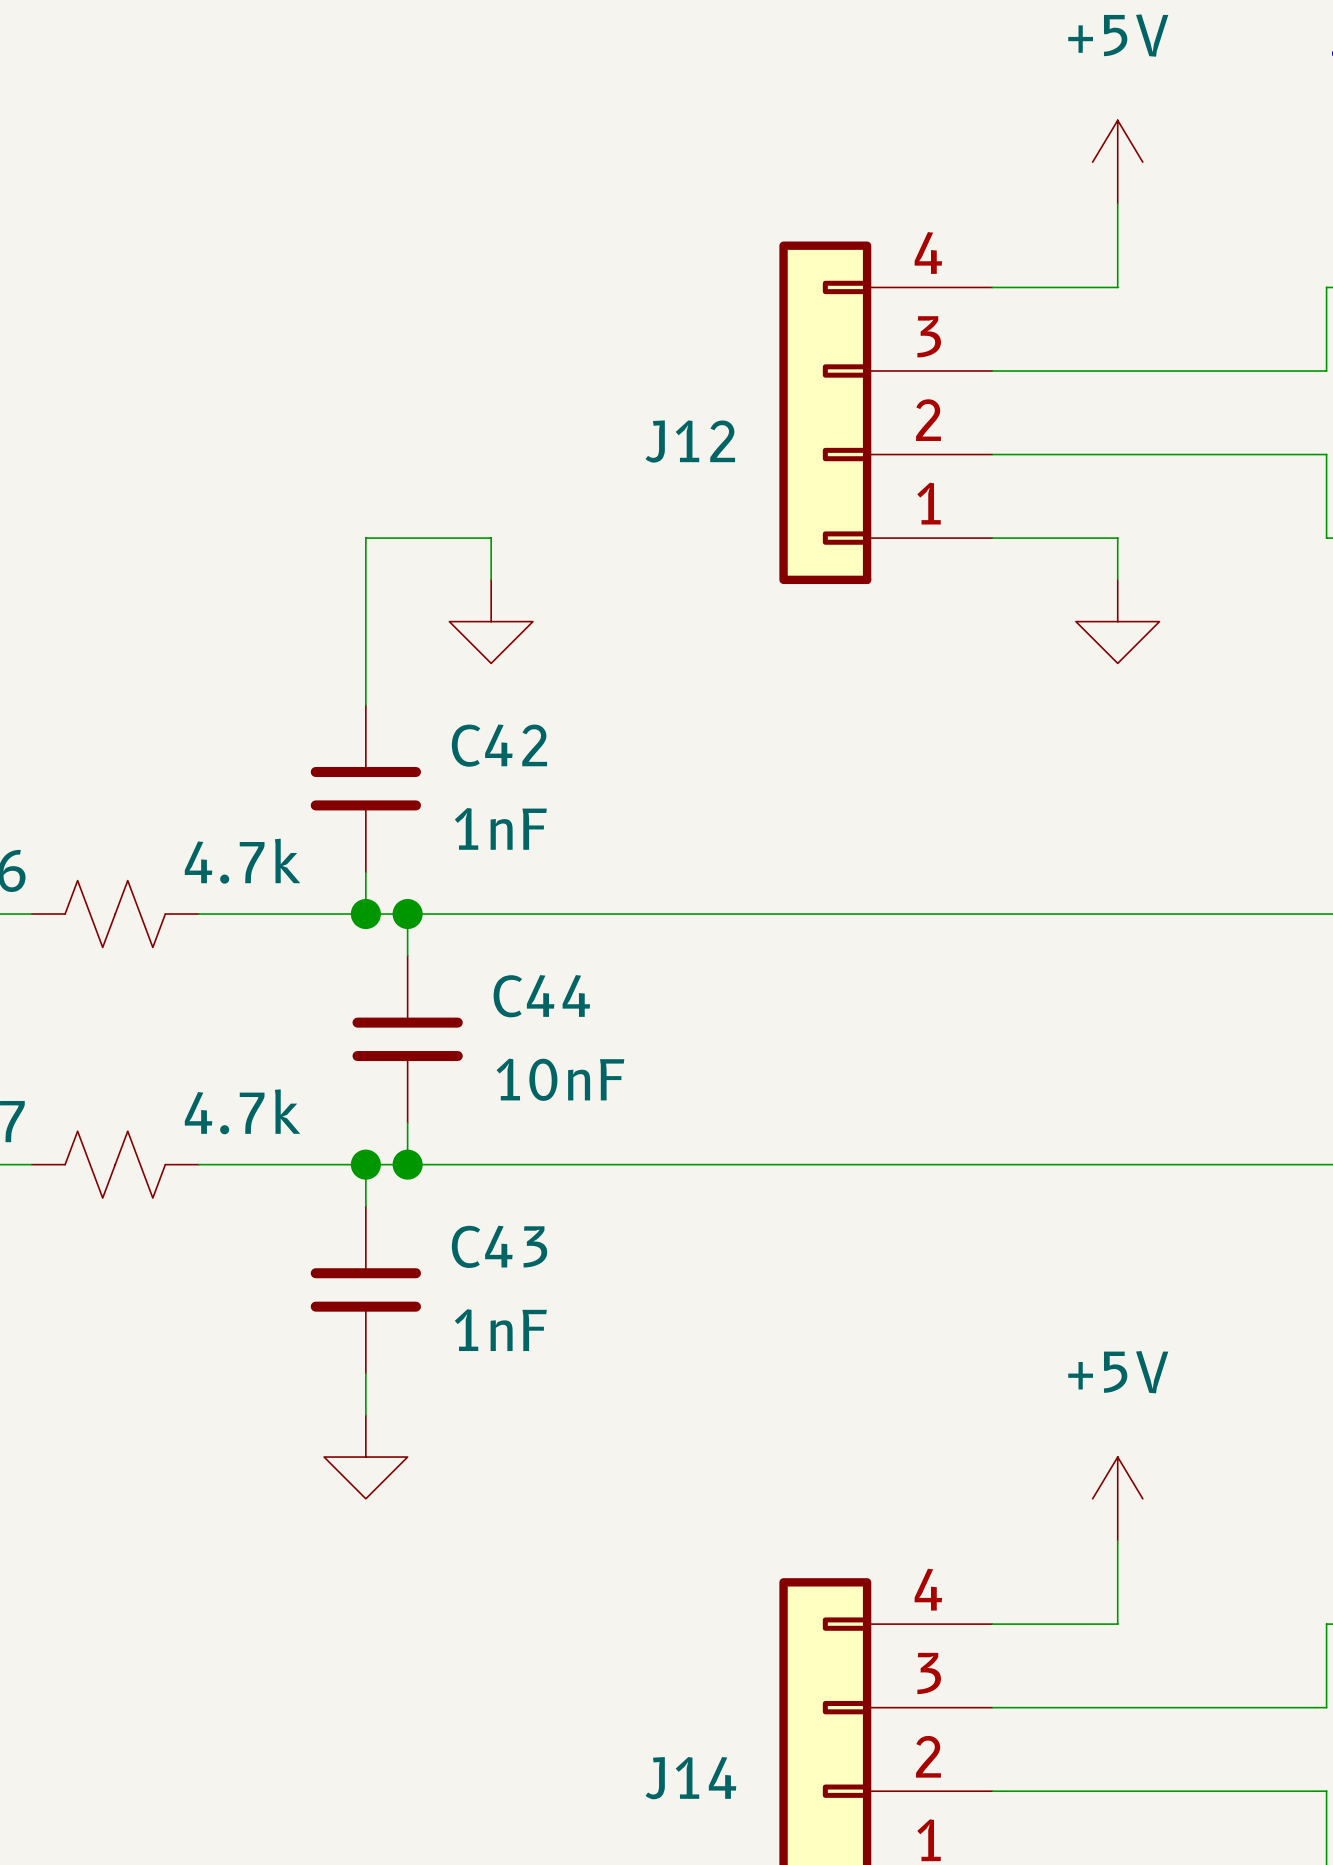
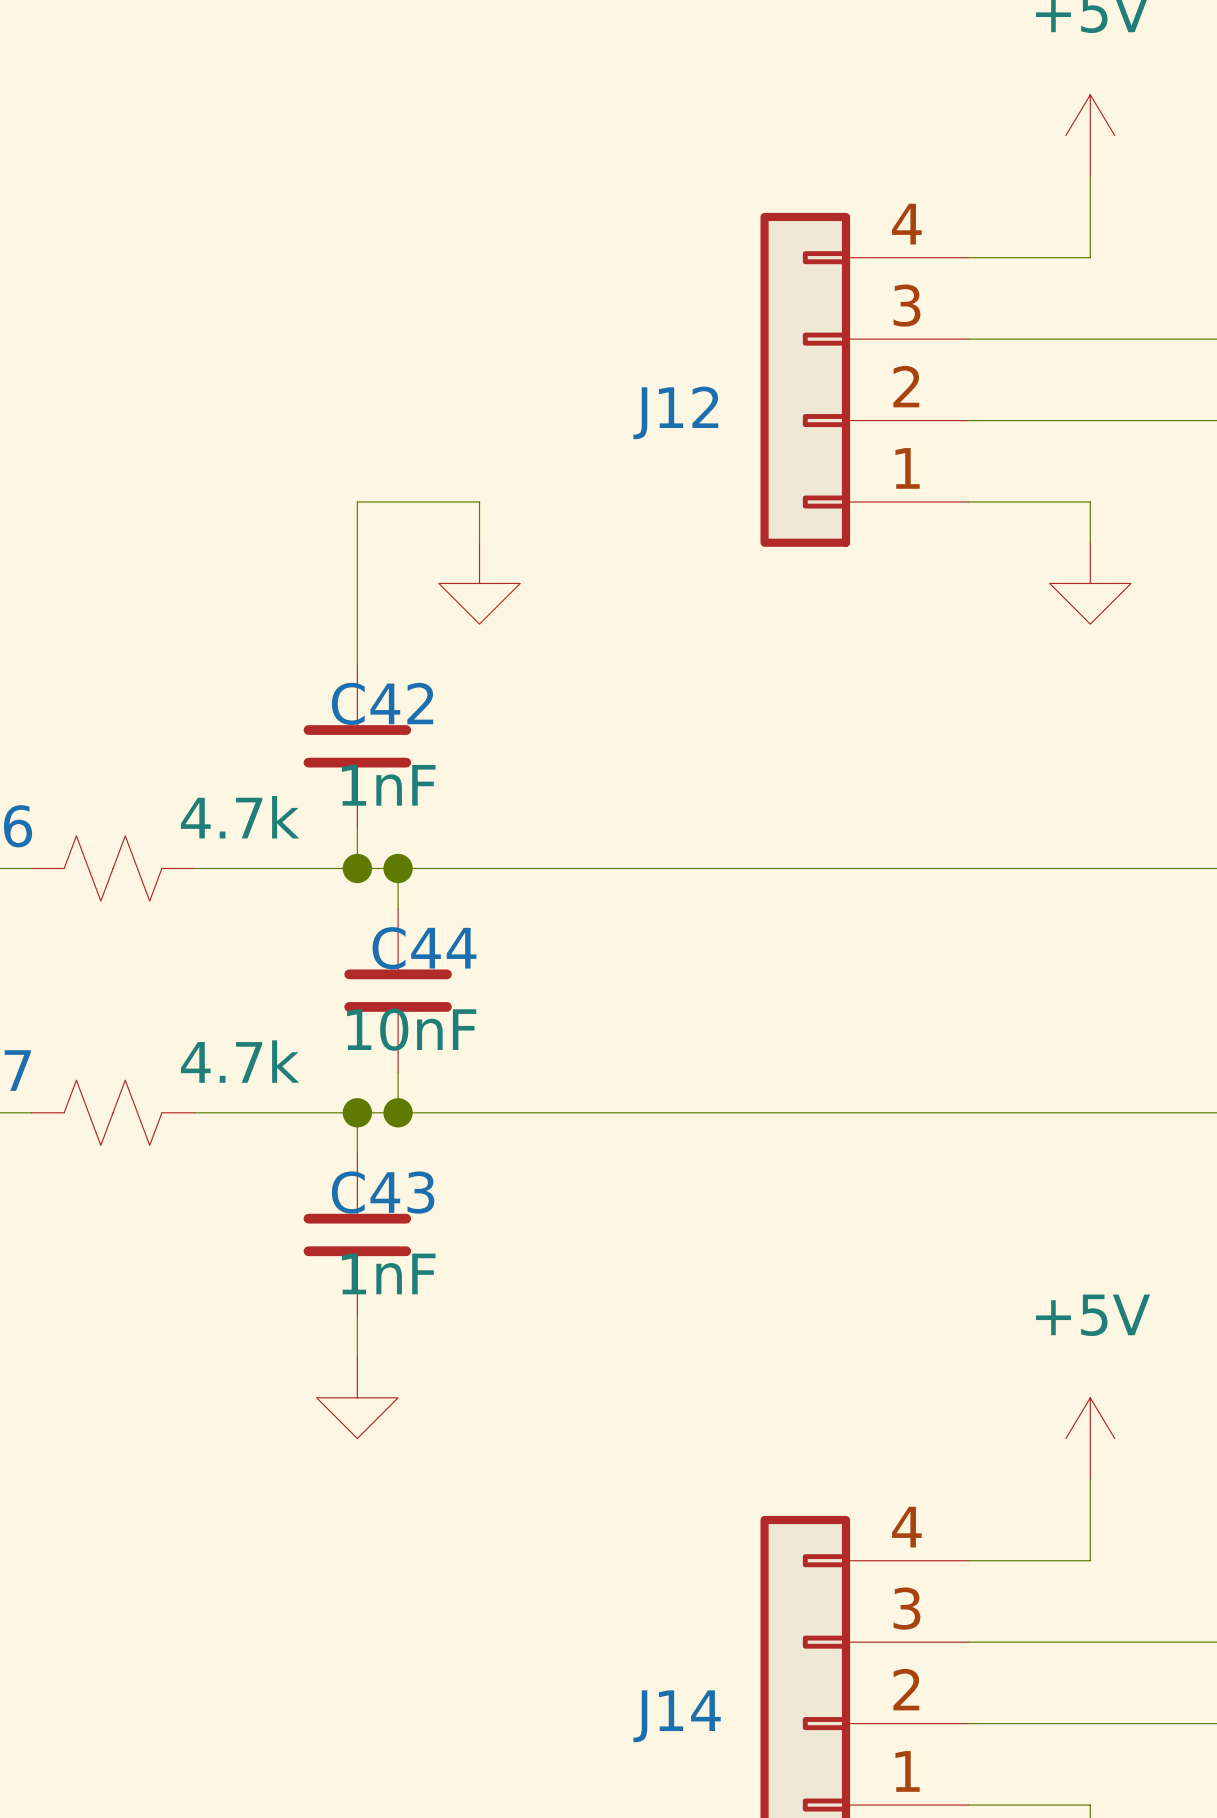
C42 name position: C42 (499, 745) -> C42 (382, 703)
C42 value position: 1nF (500, 828) -> 1nF (388, 785)
C44 name position: C44 (541, 996) -> C44 (424, 948)
C44 value position: 10nF (560, 1079) -> 10nF (411, 1029)
C43 name position: C43 (499, 1246) -> C43 (383, 1192)
C43 value position: 1nF (500, 1330) -> 1nF (388, 1273)

